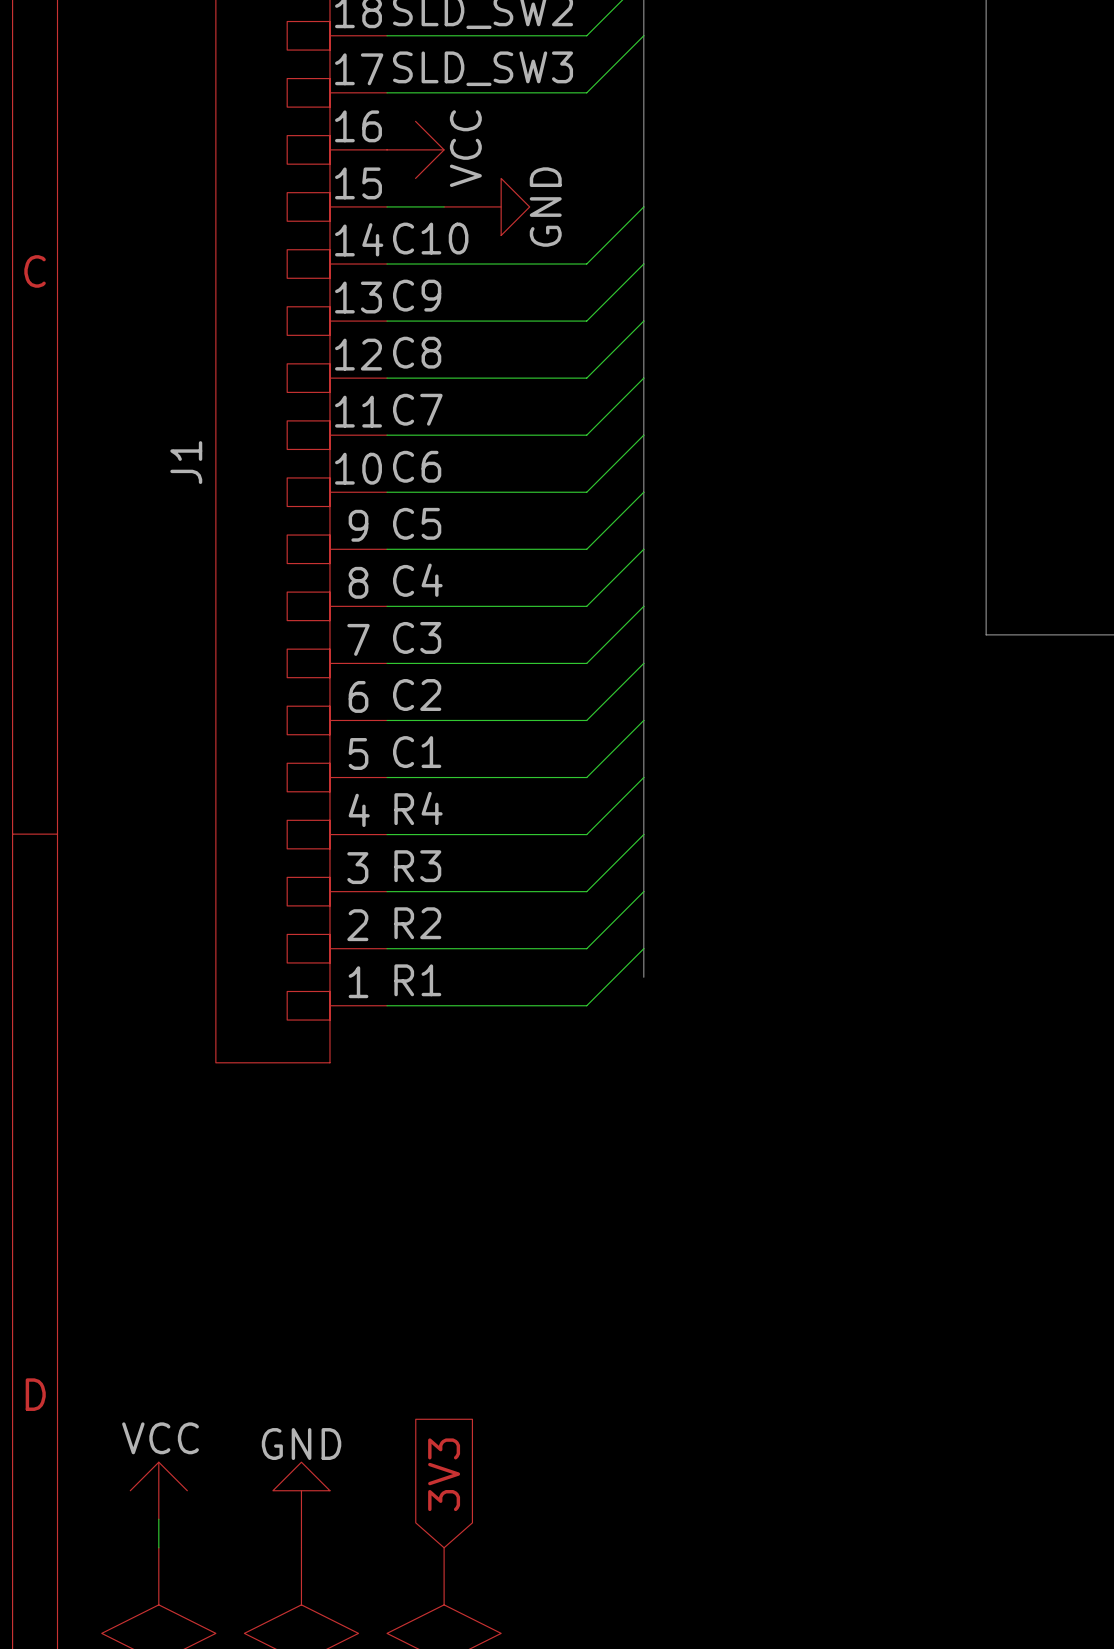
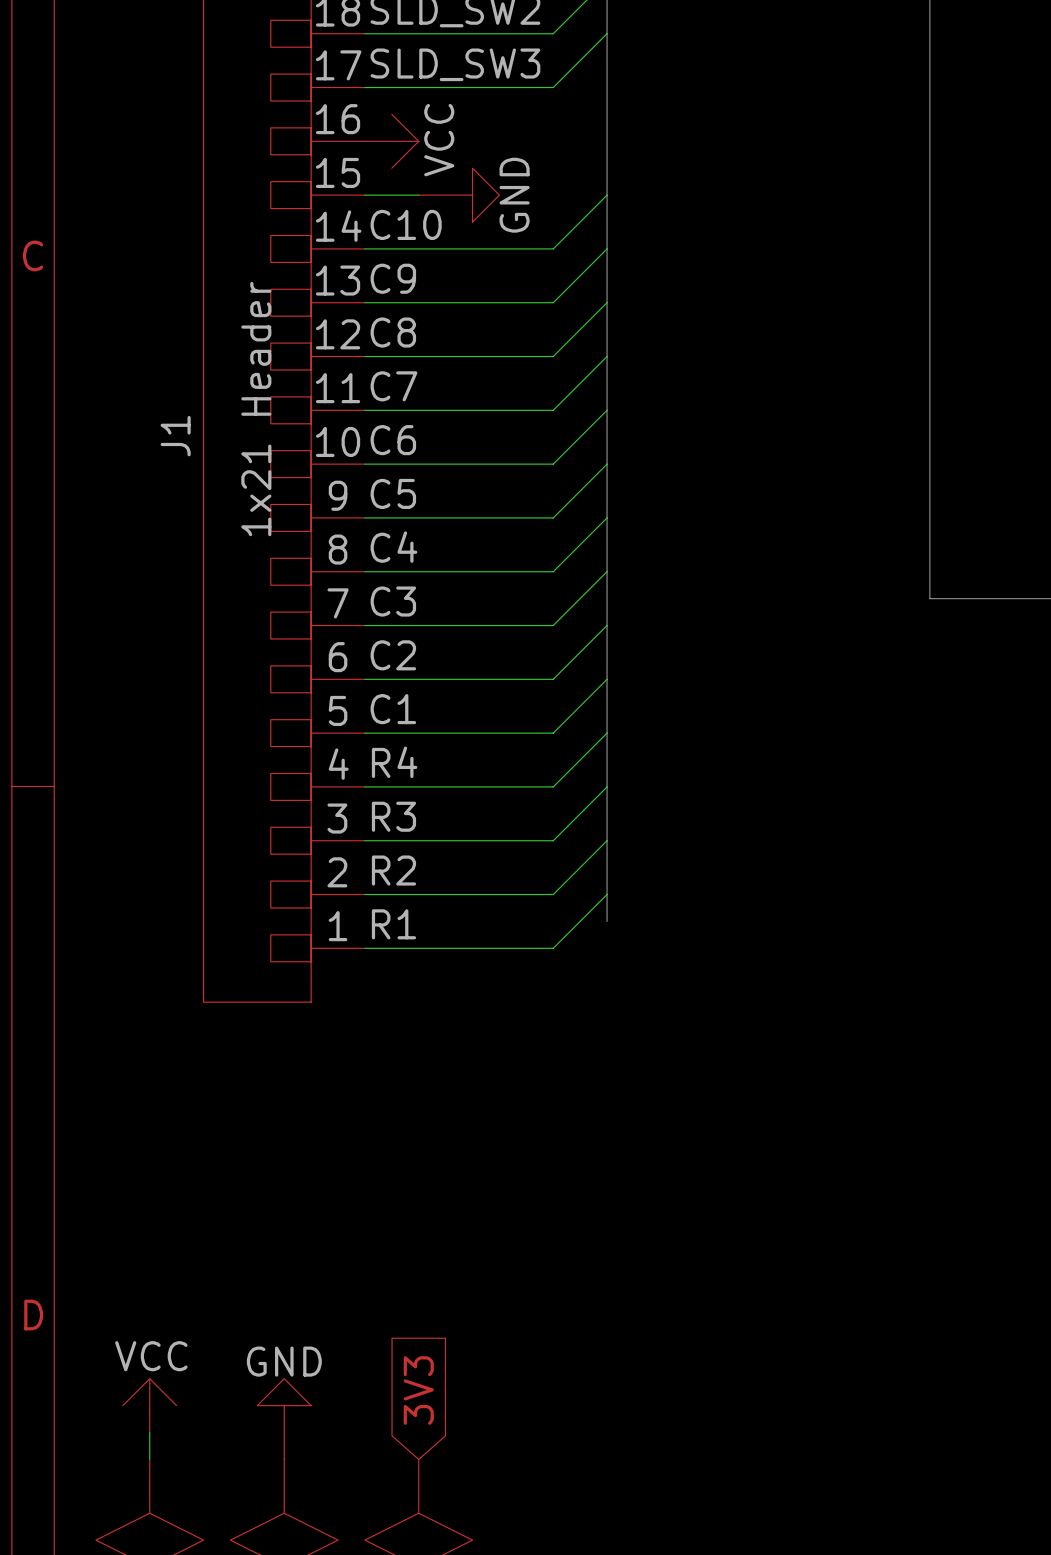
J1 value: none -> 1x21 Header (256, 409)

